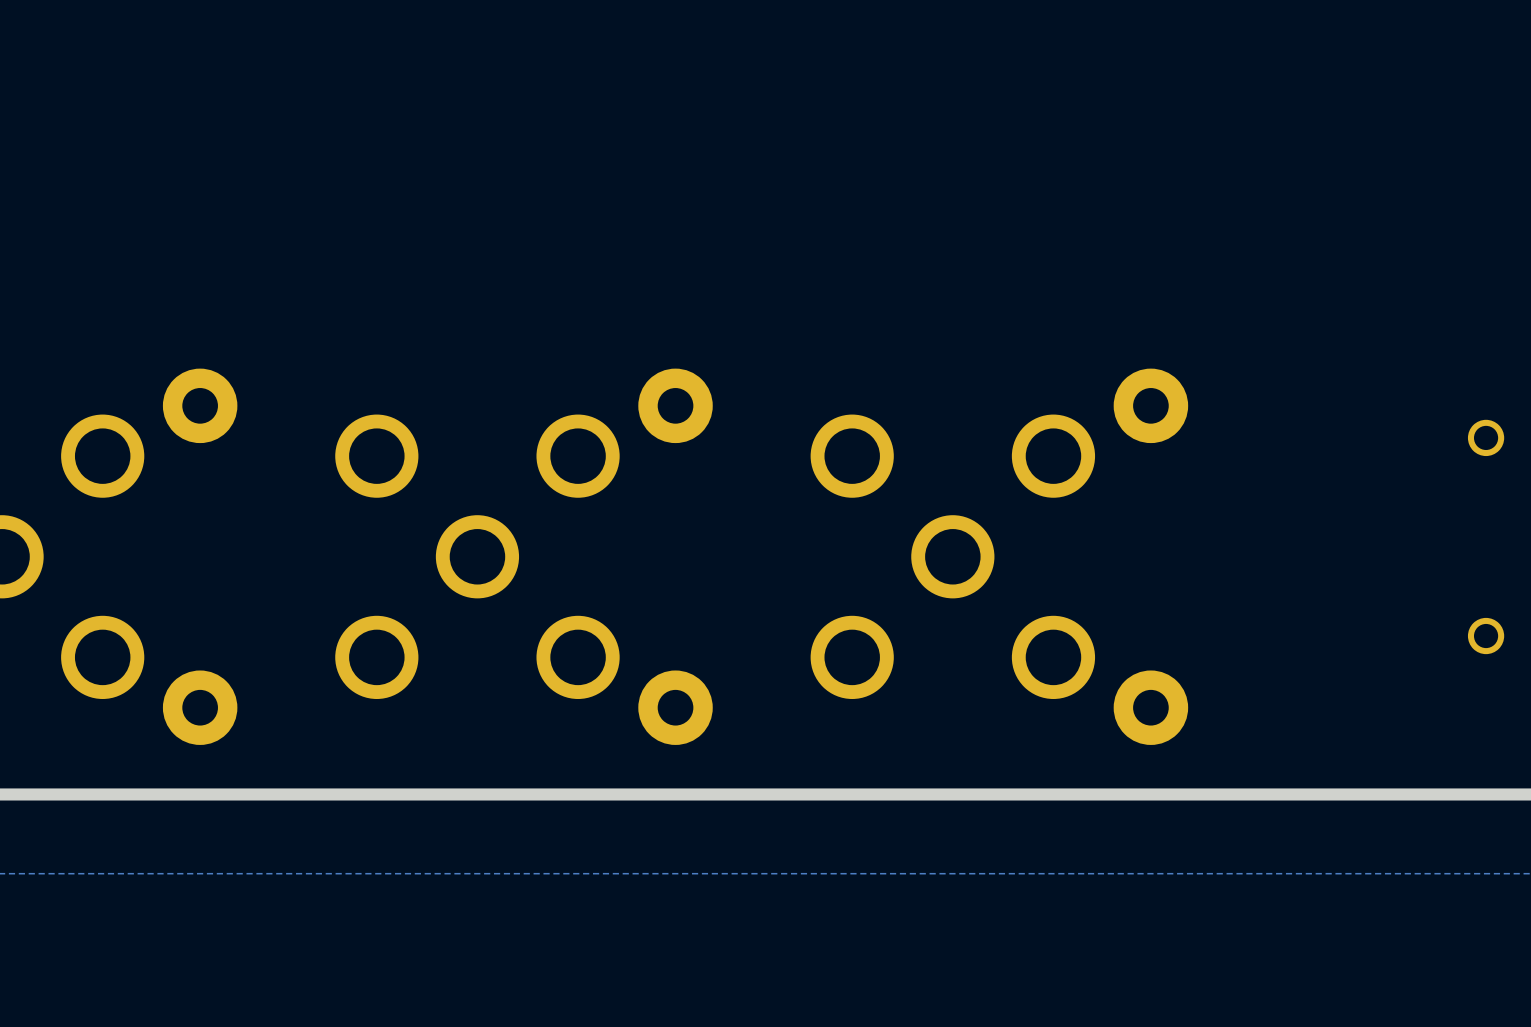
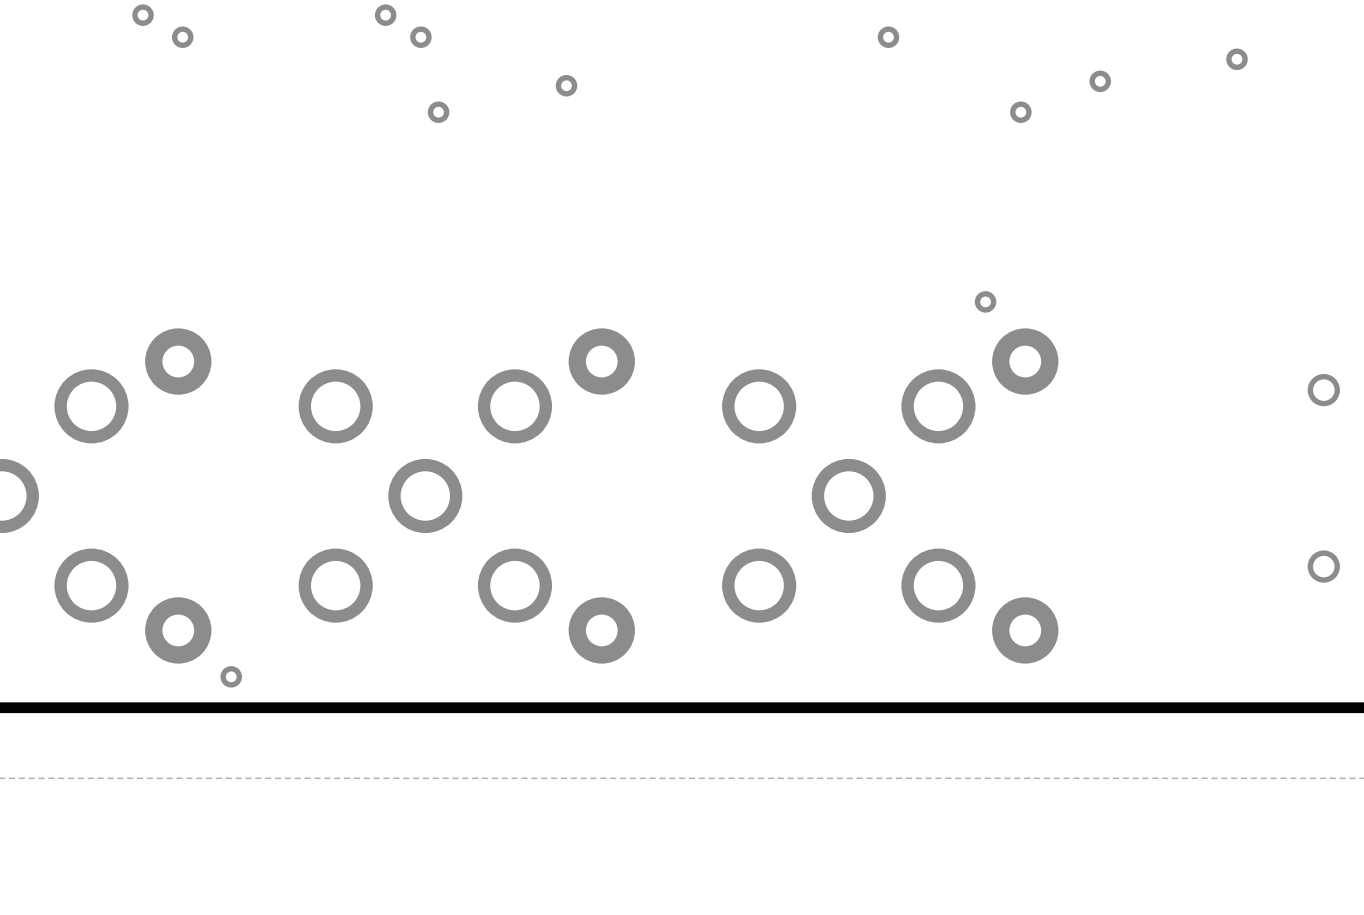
via: none -> (143, 15)
via: none -> (385, 15)
via: none -> (182, 37)
via: none -> (420, 37)
via: none -> (888, 37)
via: none -> (1237, 59)
via: none -> (1100, 81)
via: none -> (566, 85)
via: none -> (438, 112)
via: none -> (1020, 112)
via: none -> (985, 301)
via: none -> (231, 676)

